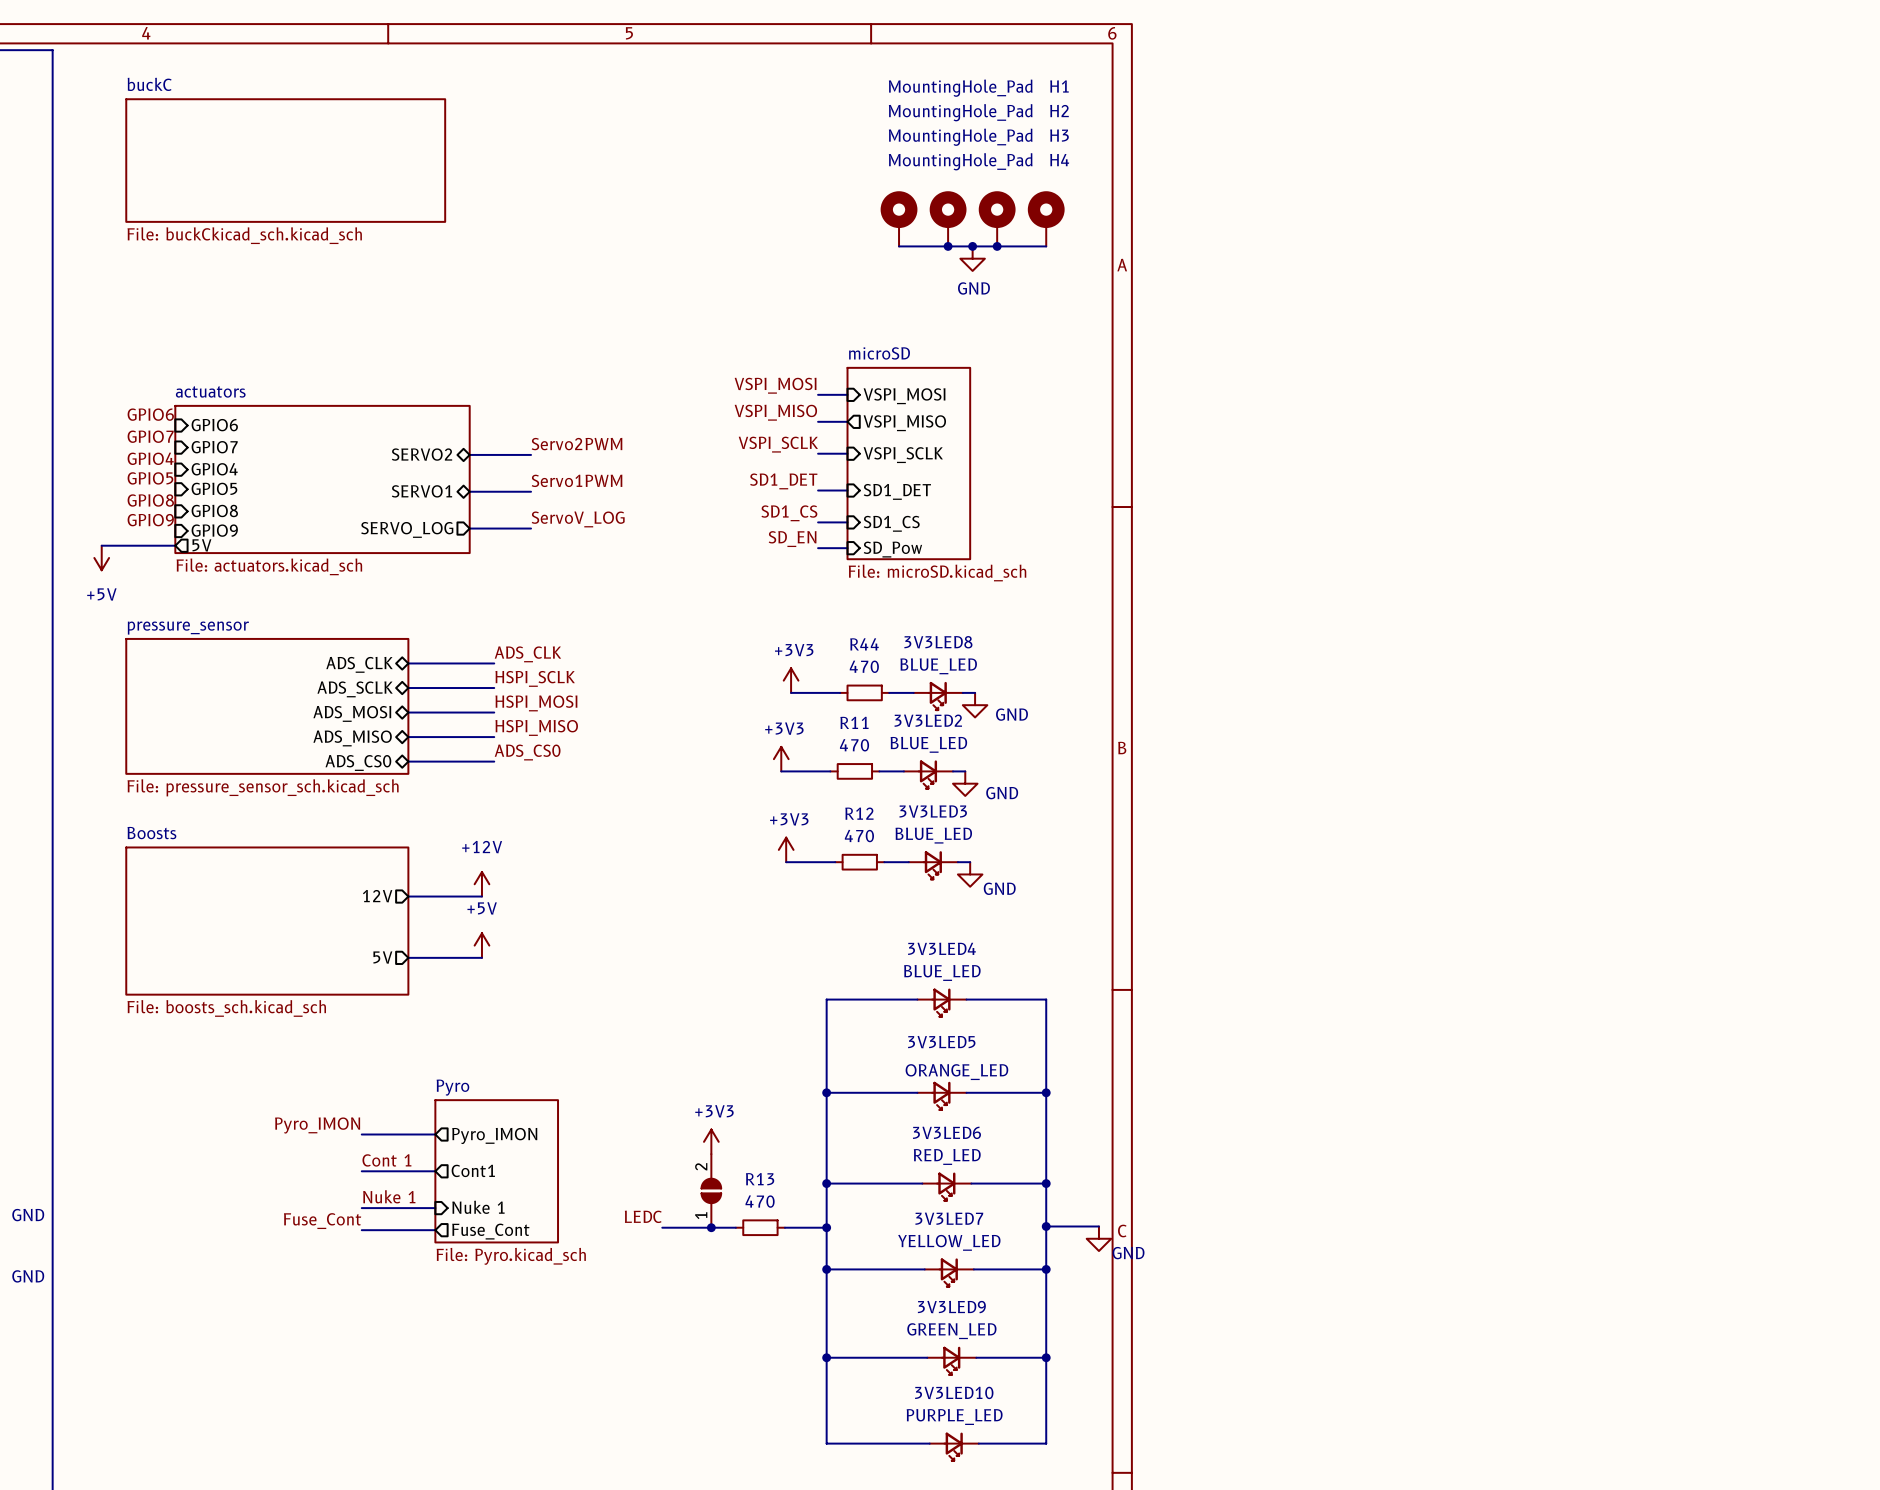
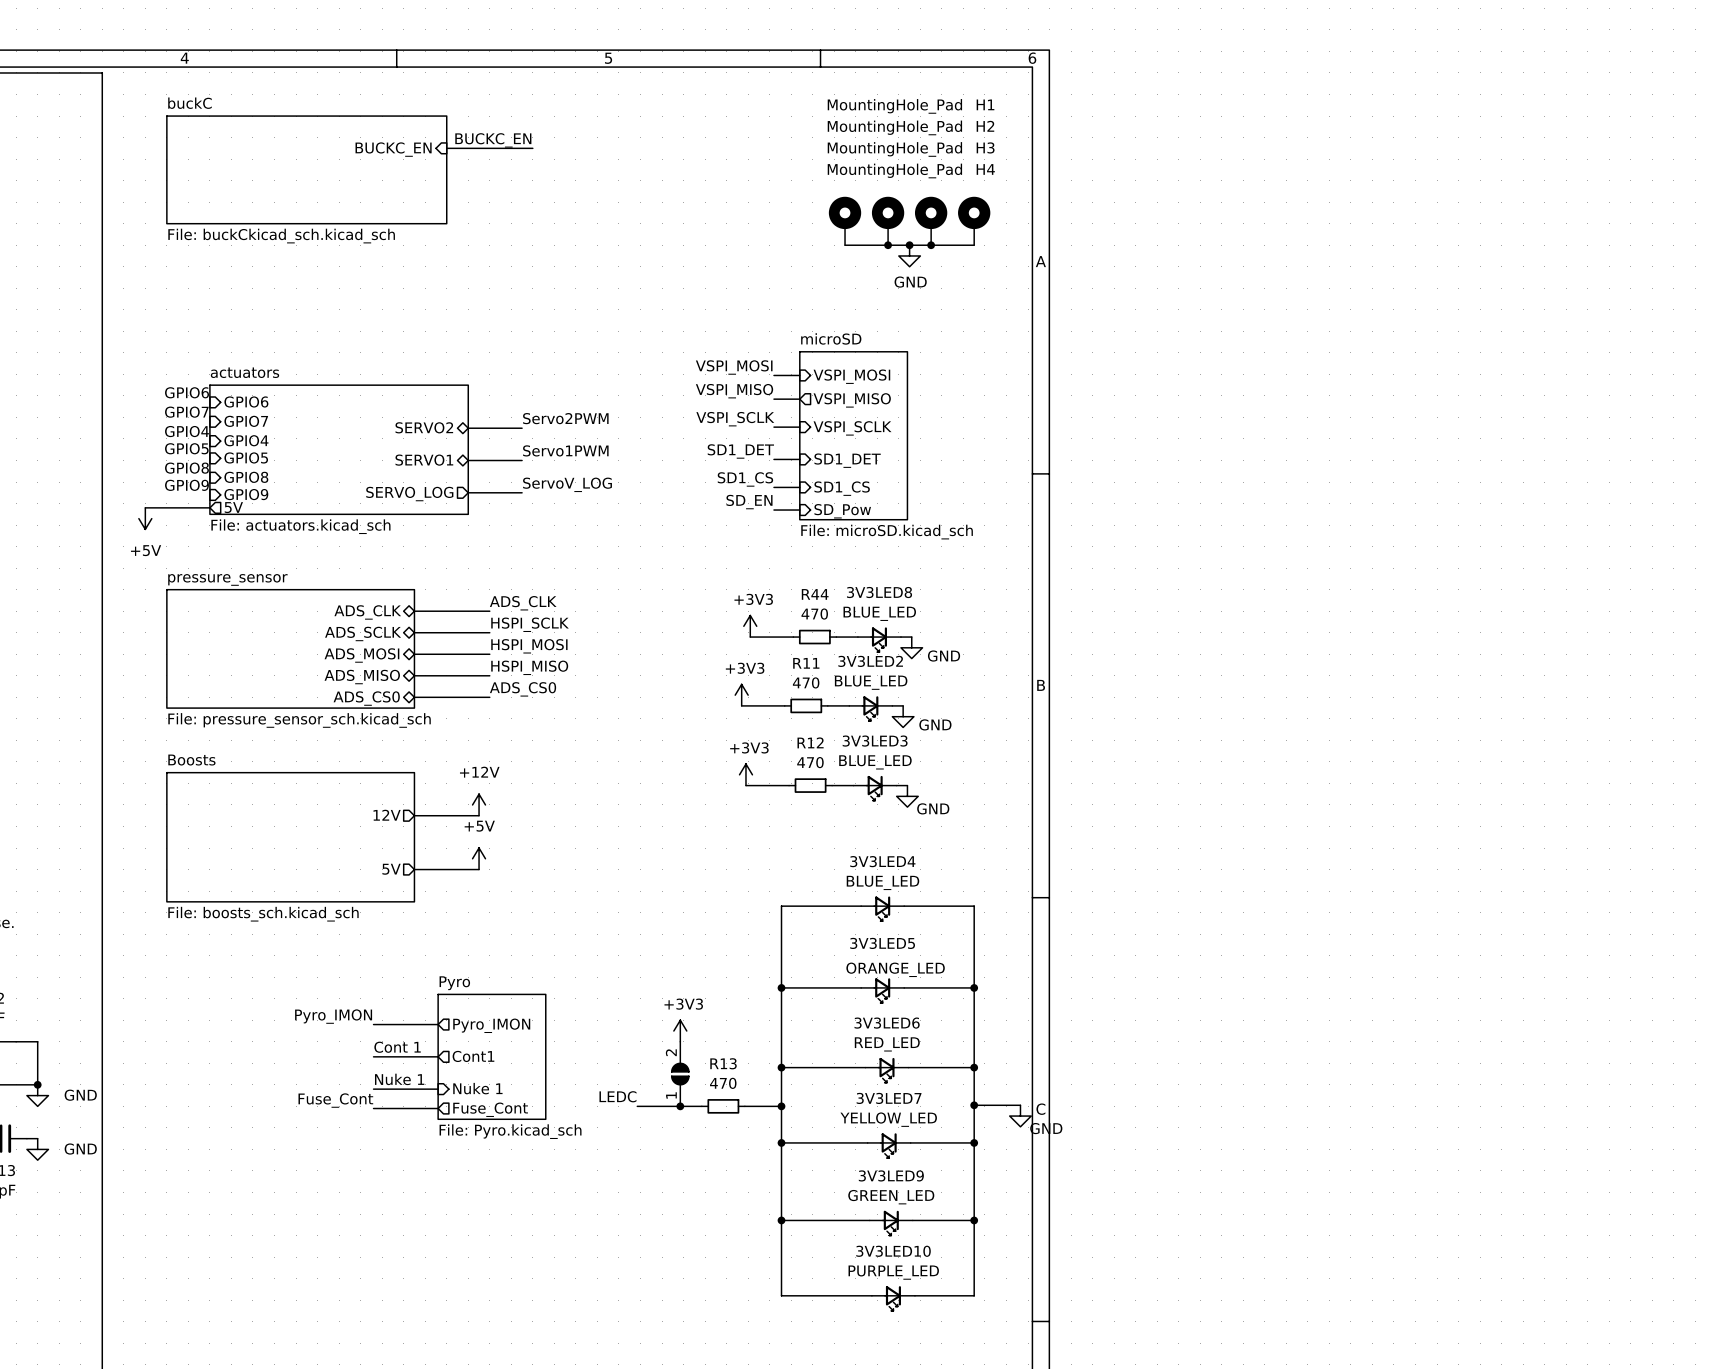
label: none -> BUCKC_EN (493, 140)
wire: none -> (446, 148) (532, 148)
sheet pin: none -> BUCKC_EN (393, 149)

